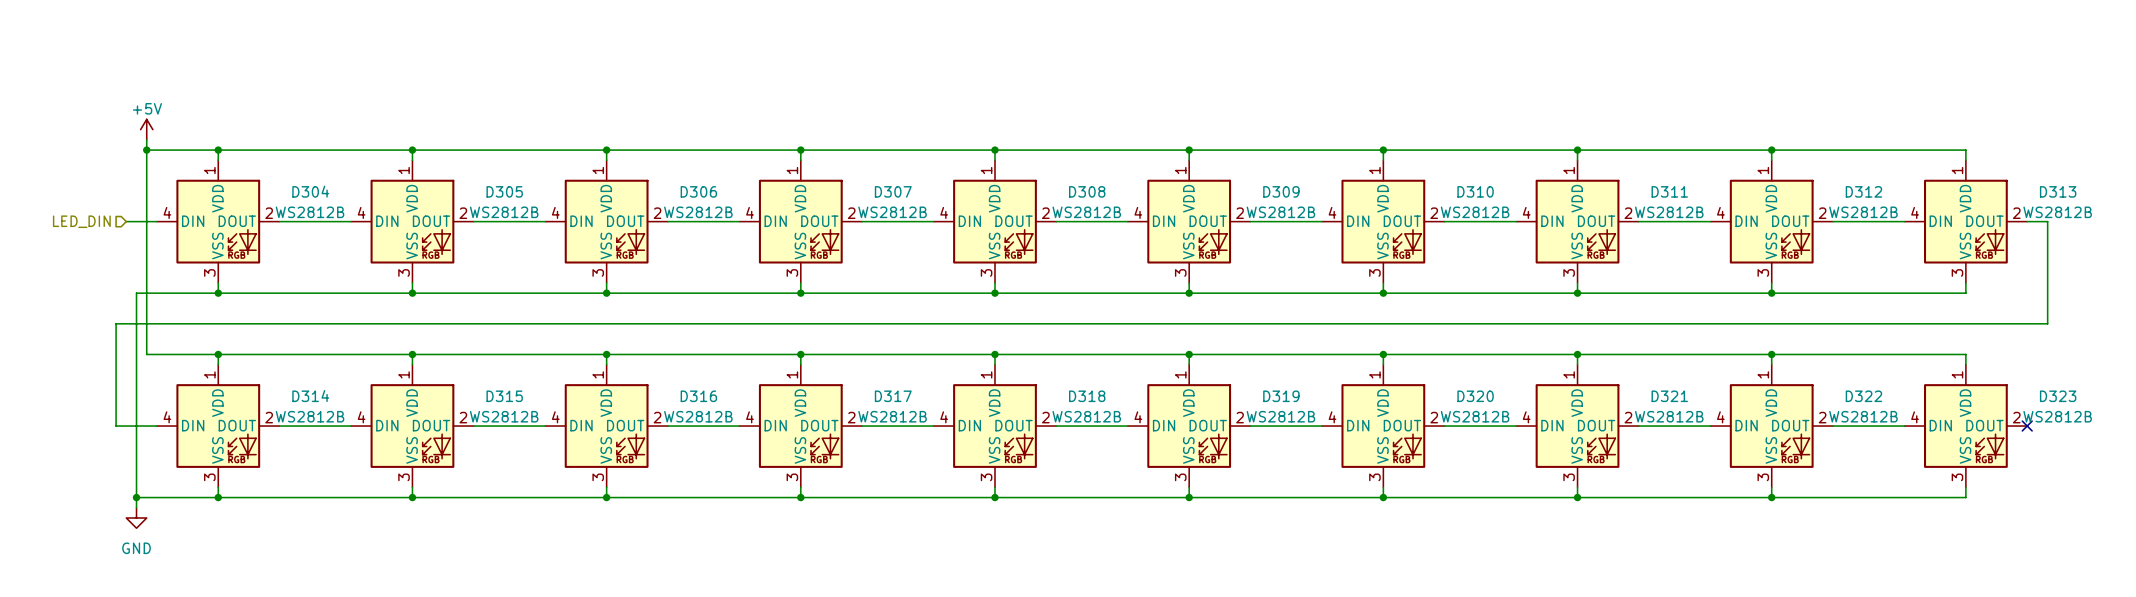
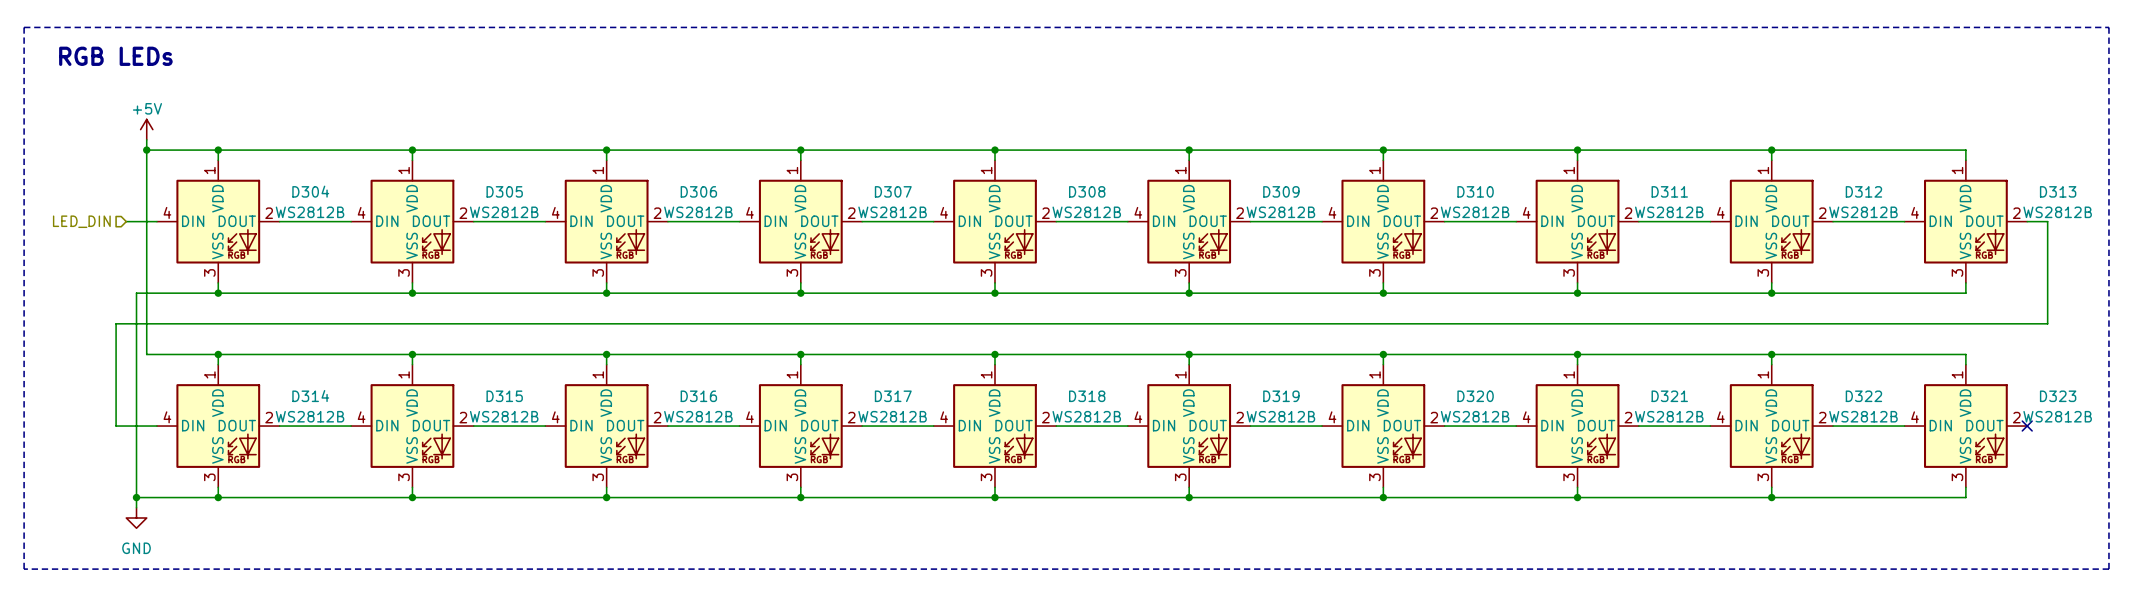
line: none -> (24, 27) (2108, 27) (2108, 569) (24, 569) (24, 27)
text: none -> RGB LEDs (115, 56)

